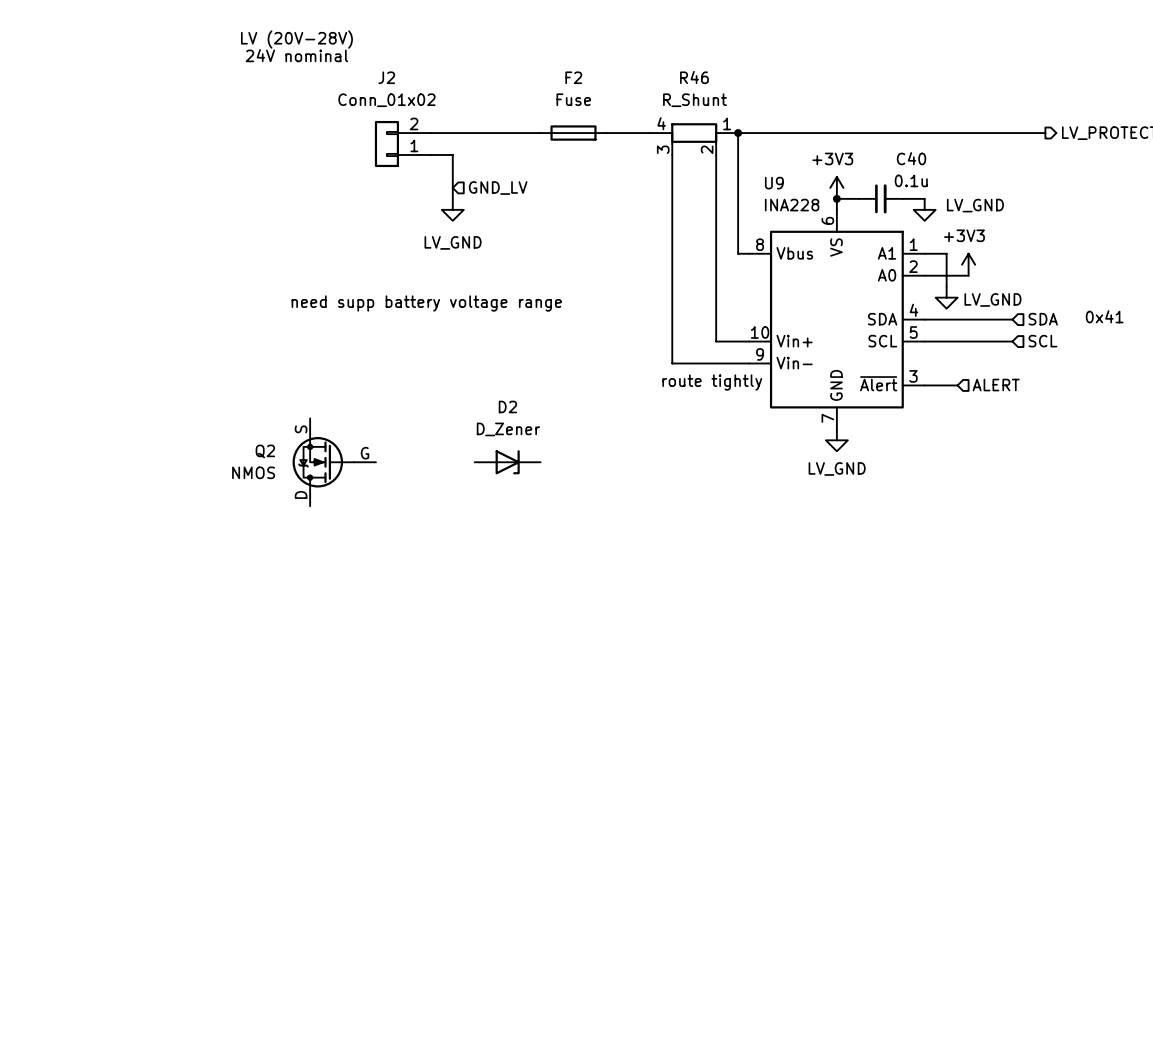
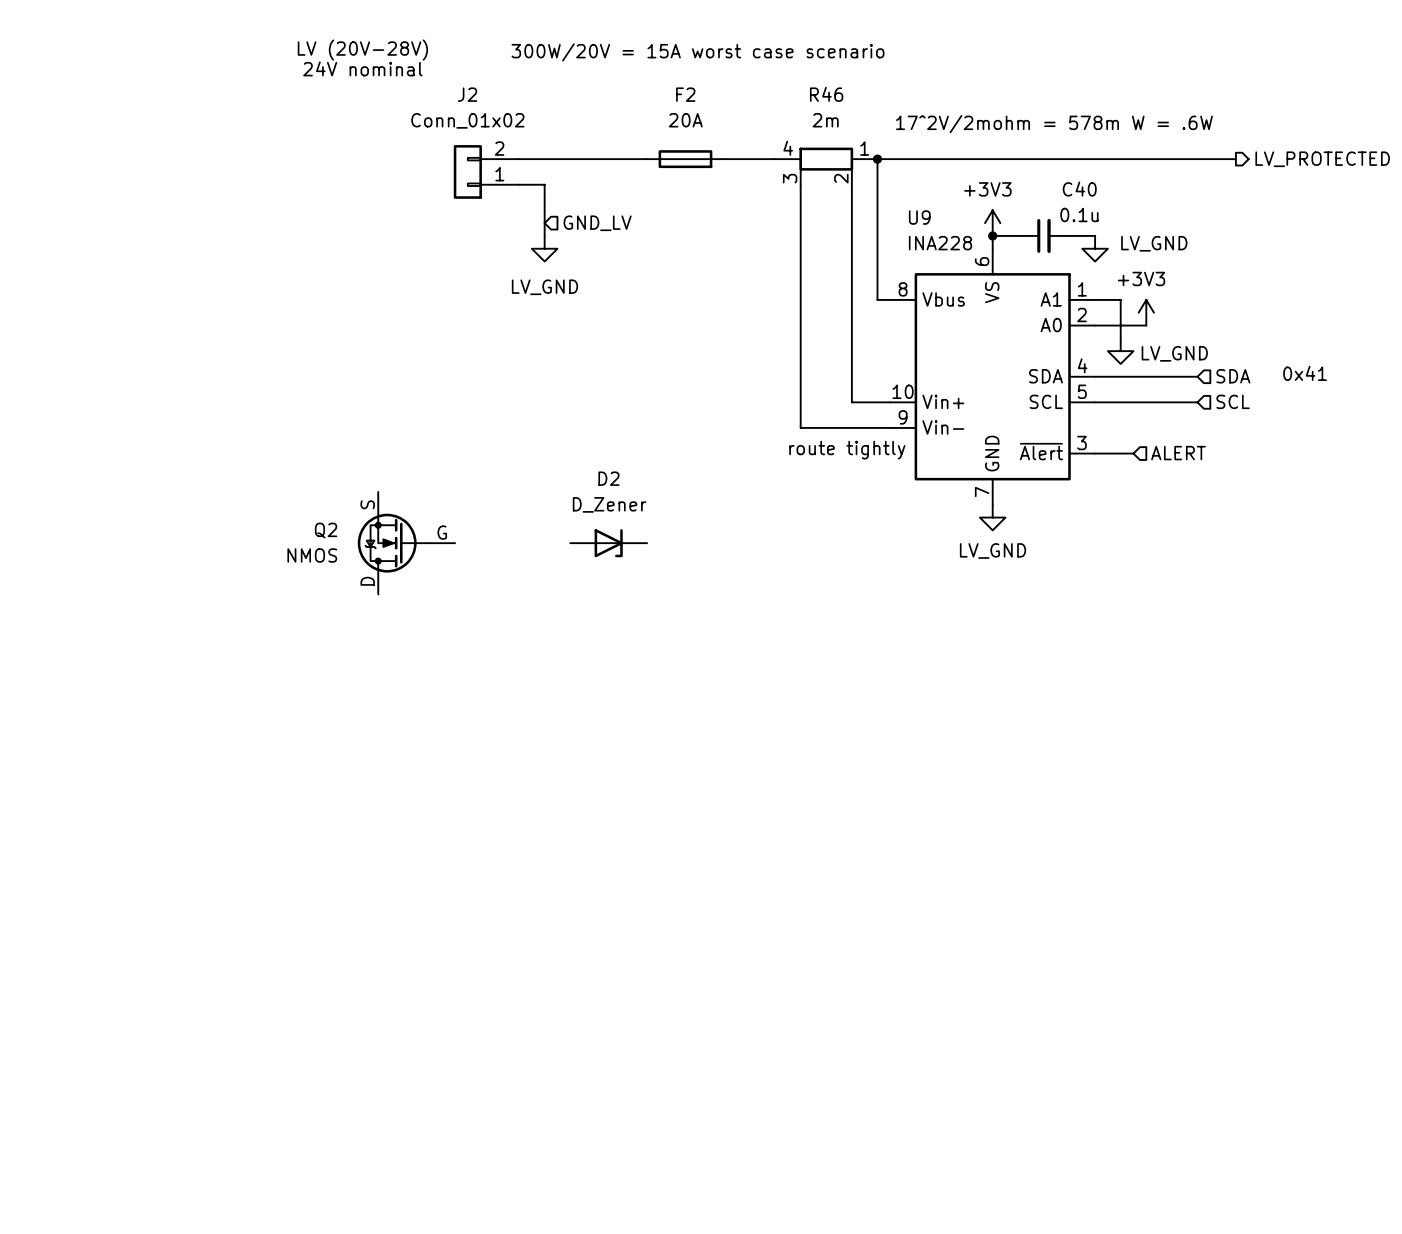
text: none -> 300W/20V = 15A worst case scenario (697, 52)
F2 value: Fuse (573, 99) -> 20A (685, 120)
R46 value: R_Shunt (695, 100) -> 2m (825, 120)
text: none -> 17^2V/2mohm = 578m W = .6W (1054, 124)
text: need supp battery voltage range (426, 303) -> none

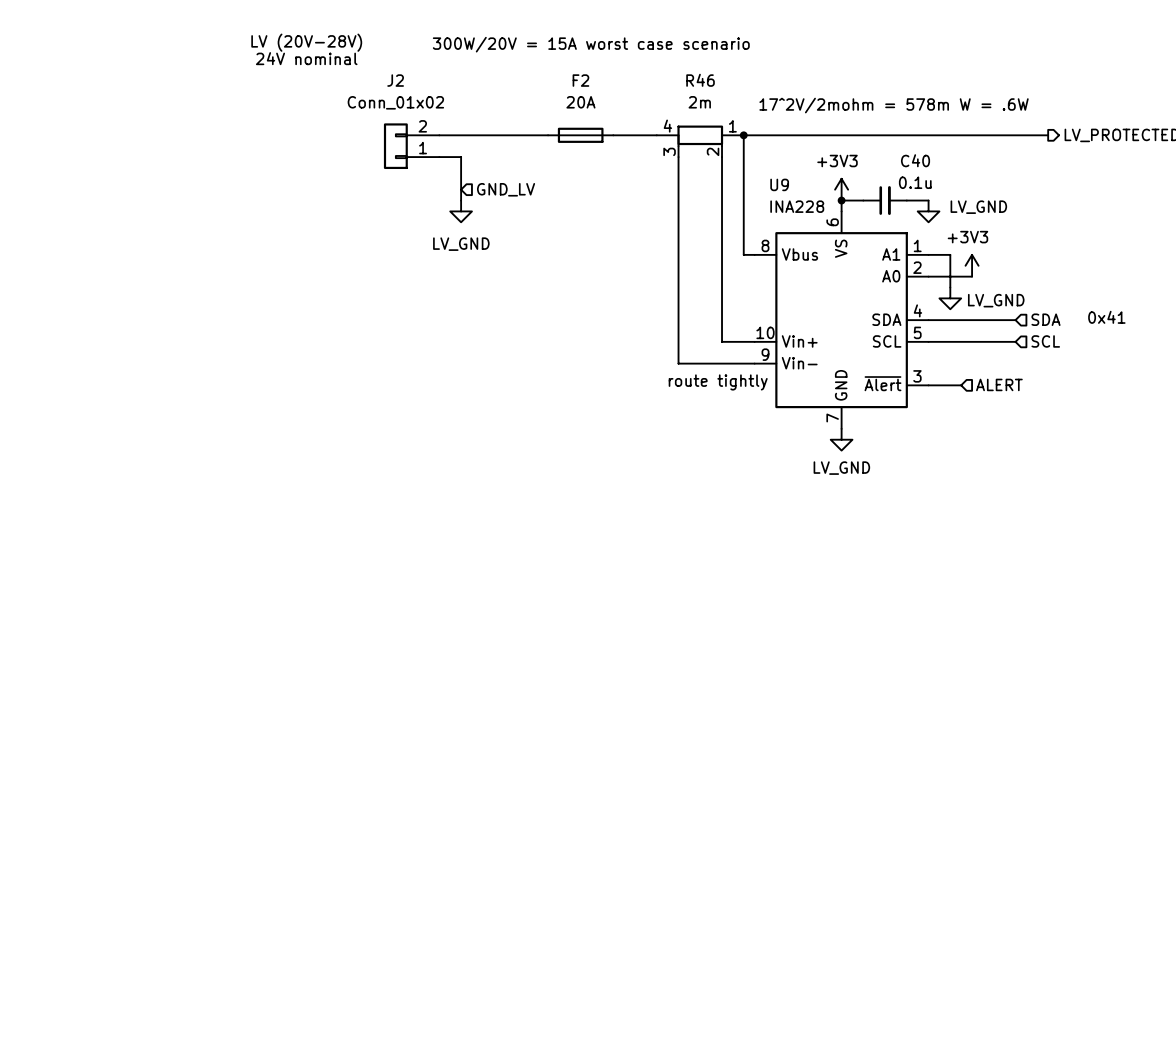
Q2: NMOS (406, 543) -> none
D2: D_Zener (608, 543) -> none

